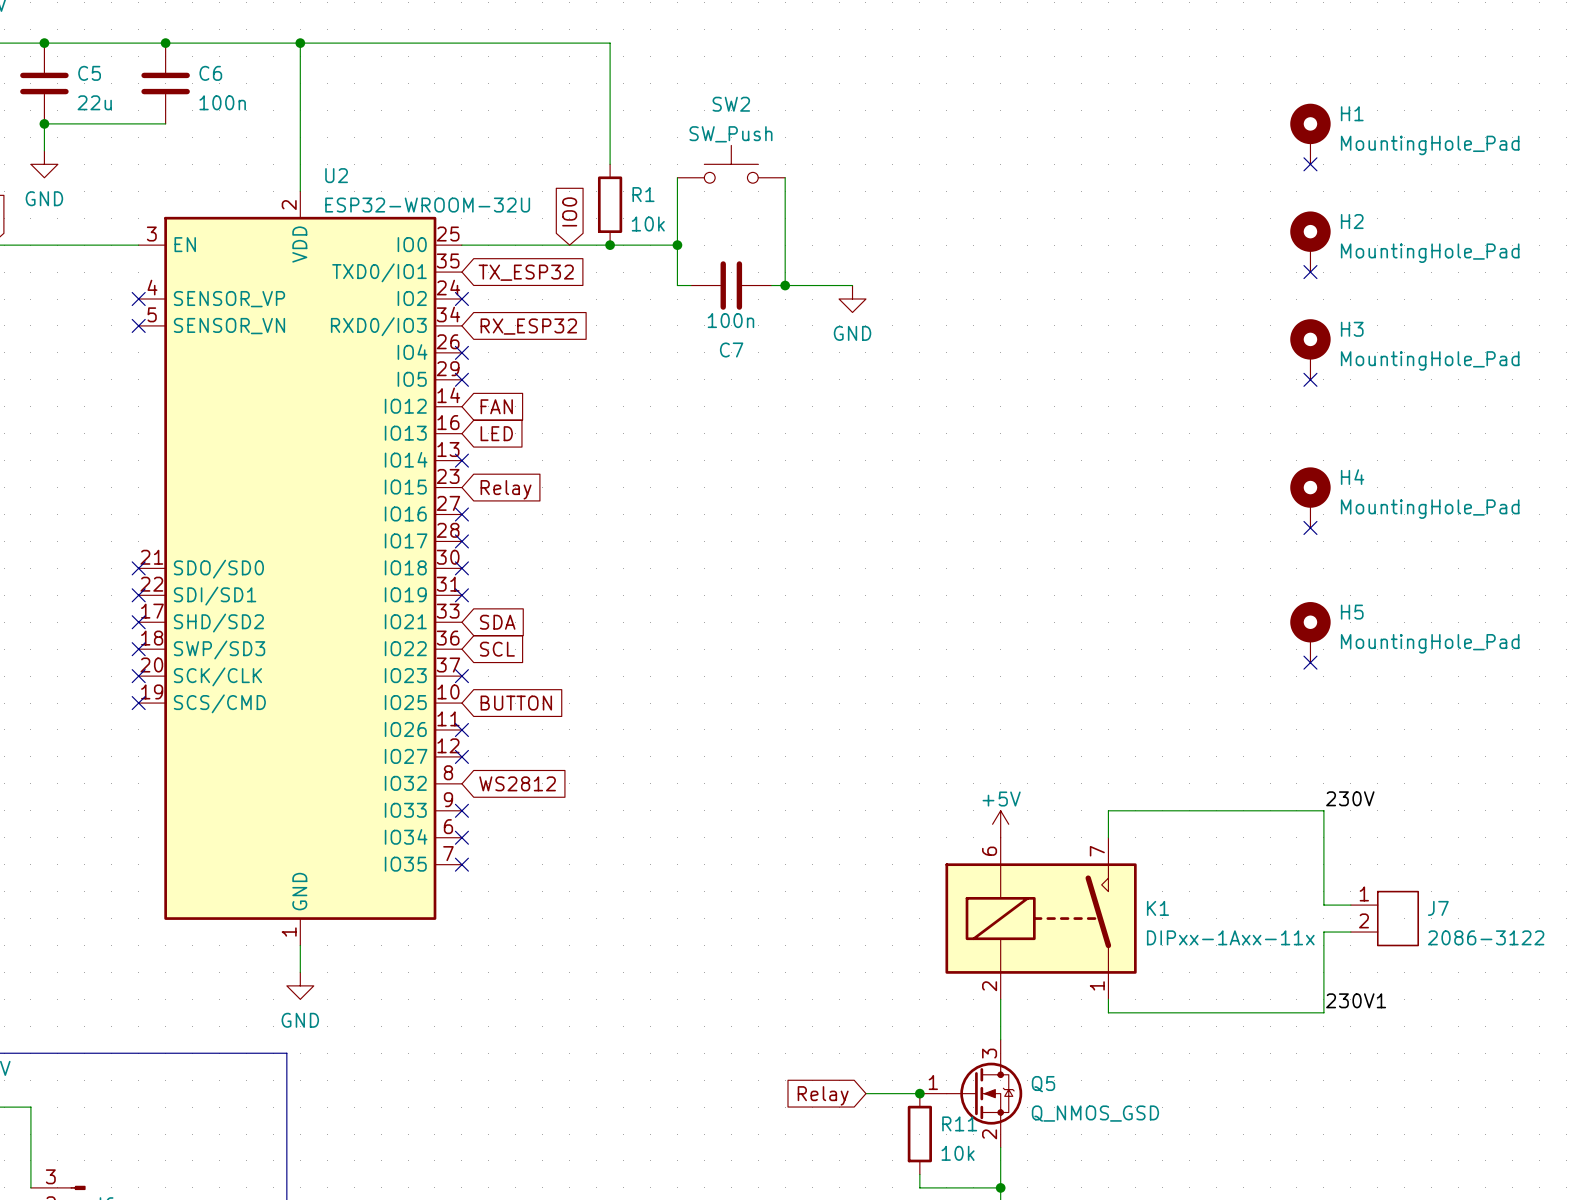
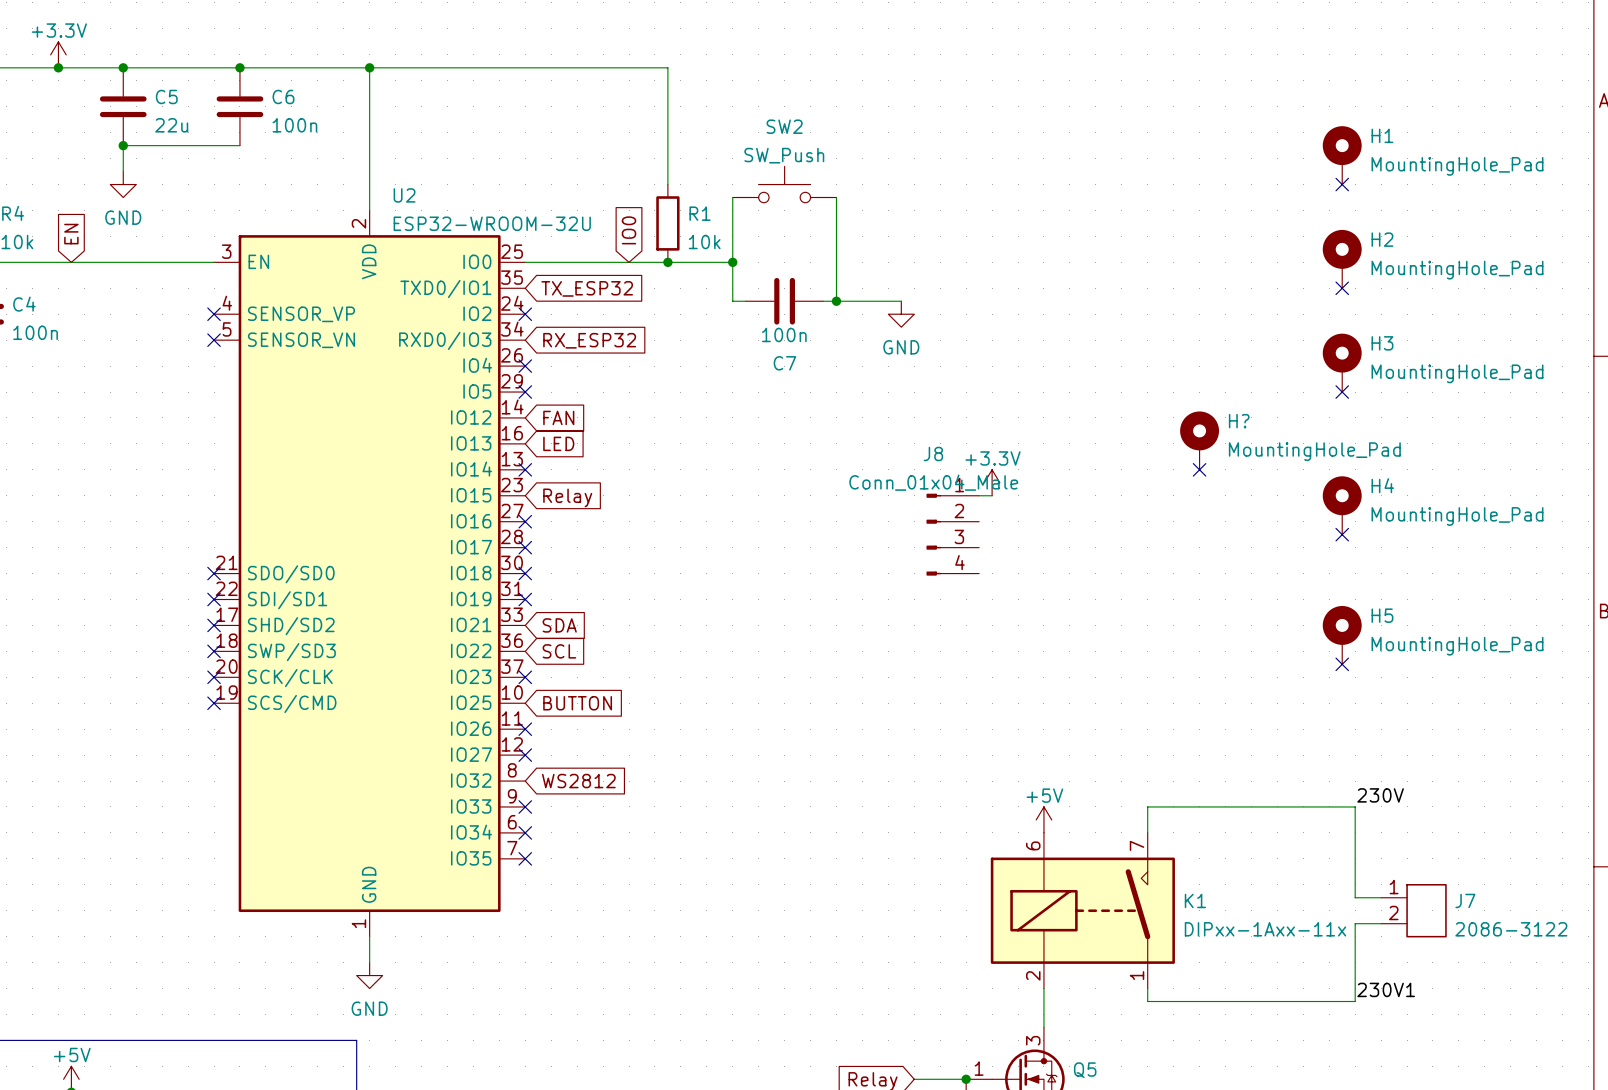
H?: none -> MountingHole_Pad (1199, 440)
no-connect mark: none -> (1199, 469)
power symbol: none -> +3.3V (992, 482)
wire: none -> (979, 495) (992, 495)
J8: none -> Conn_01x04_Male (952, 534)

